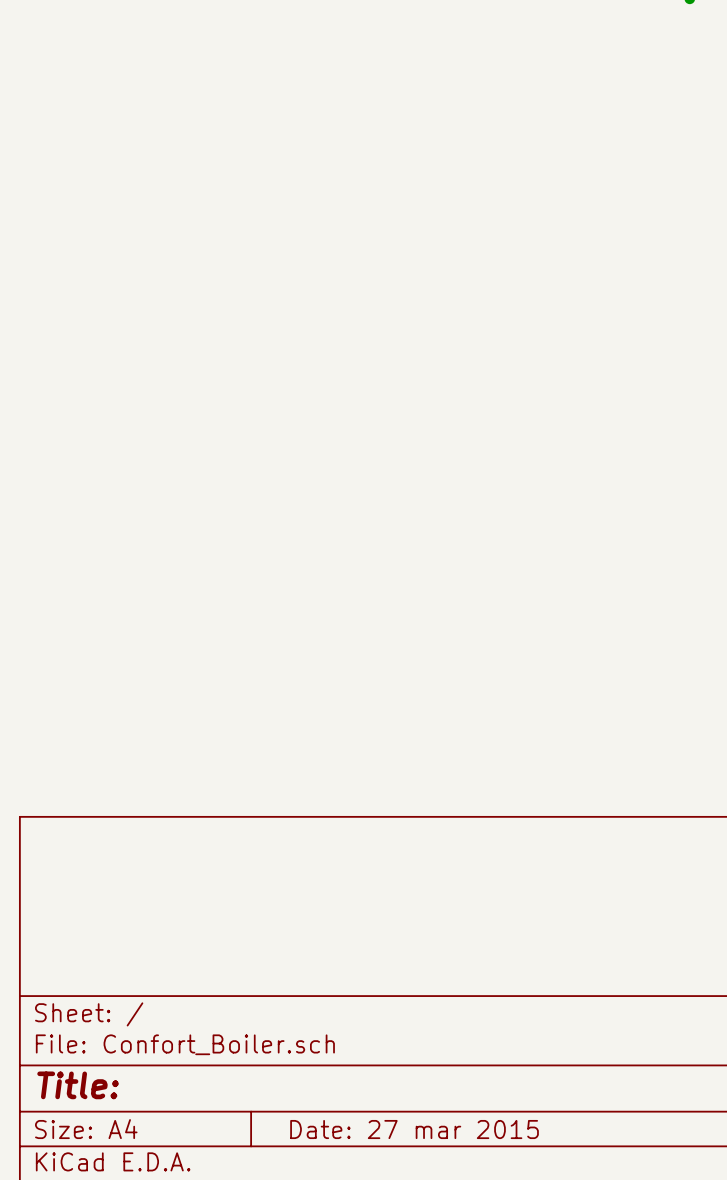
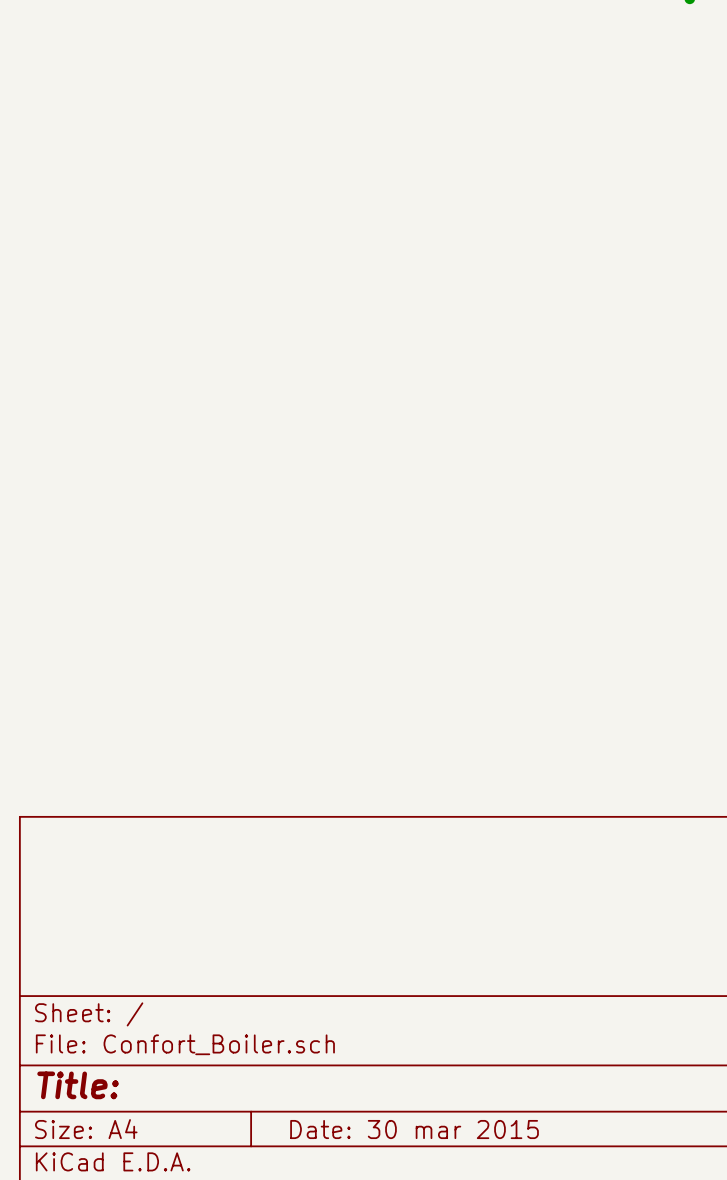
title block: Date: 27 mar 2015 (414, 1129) -> Date: 30 mar 2015 (414, 1129)

